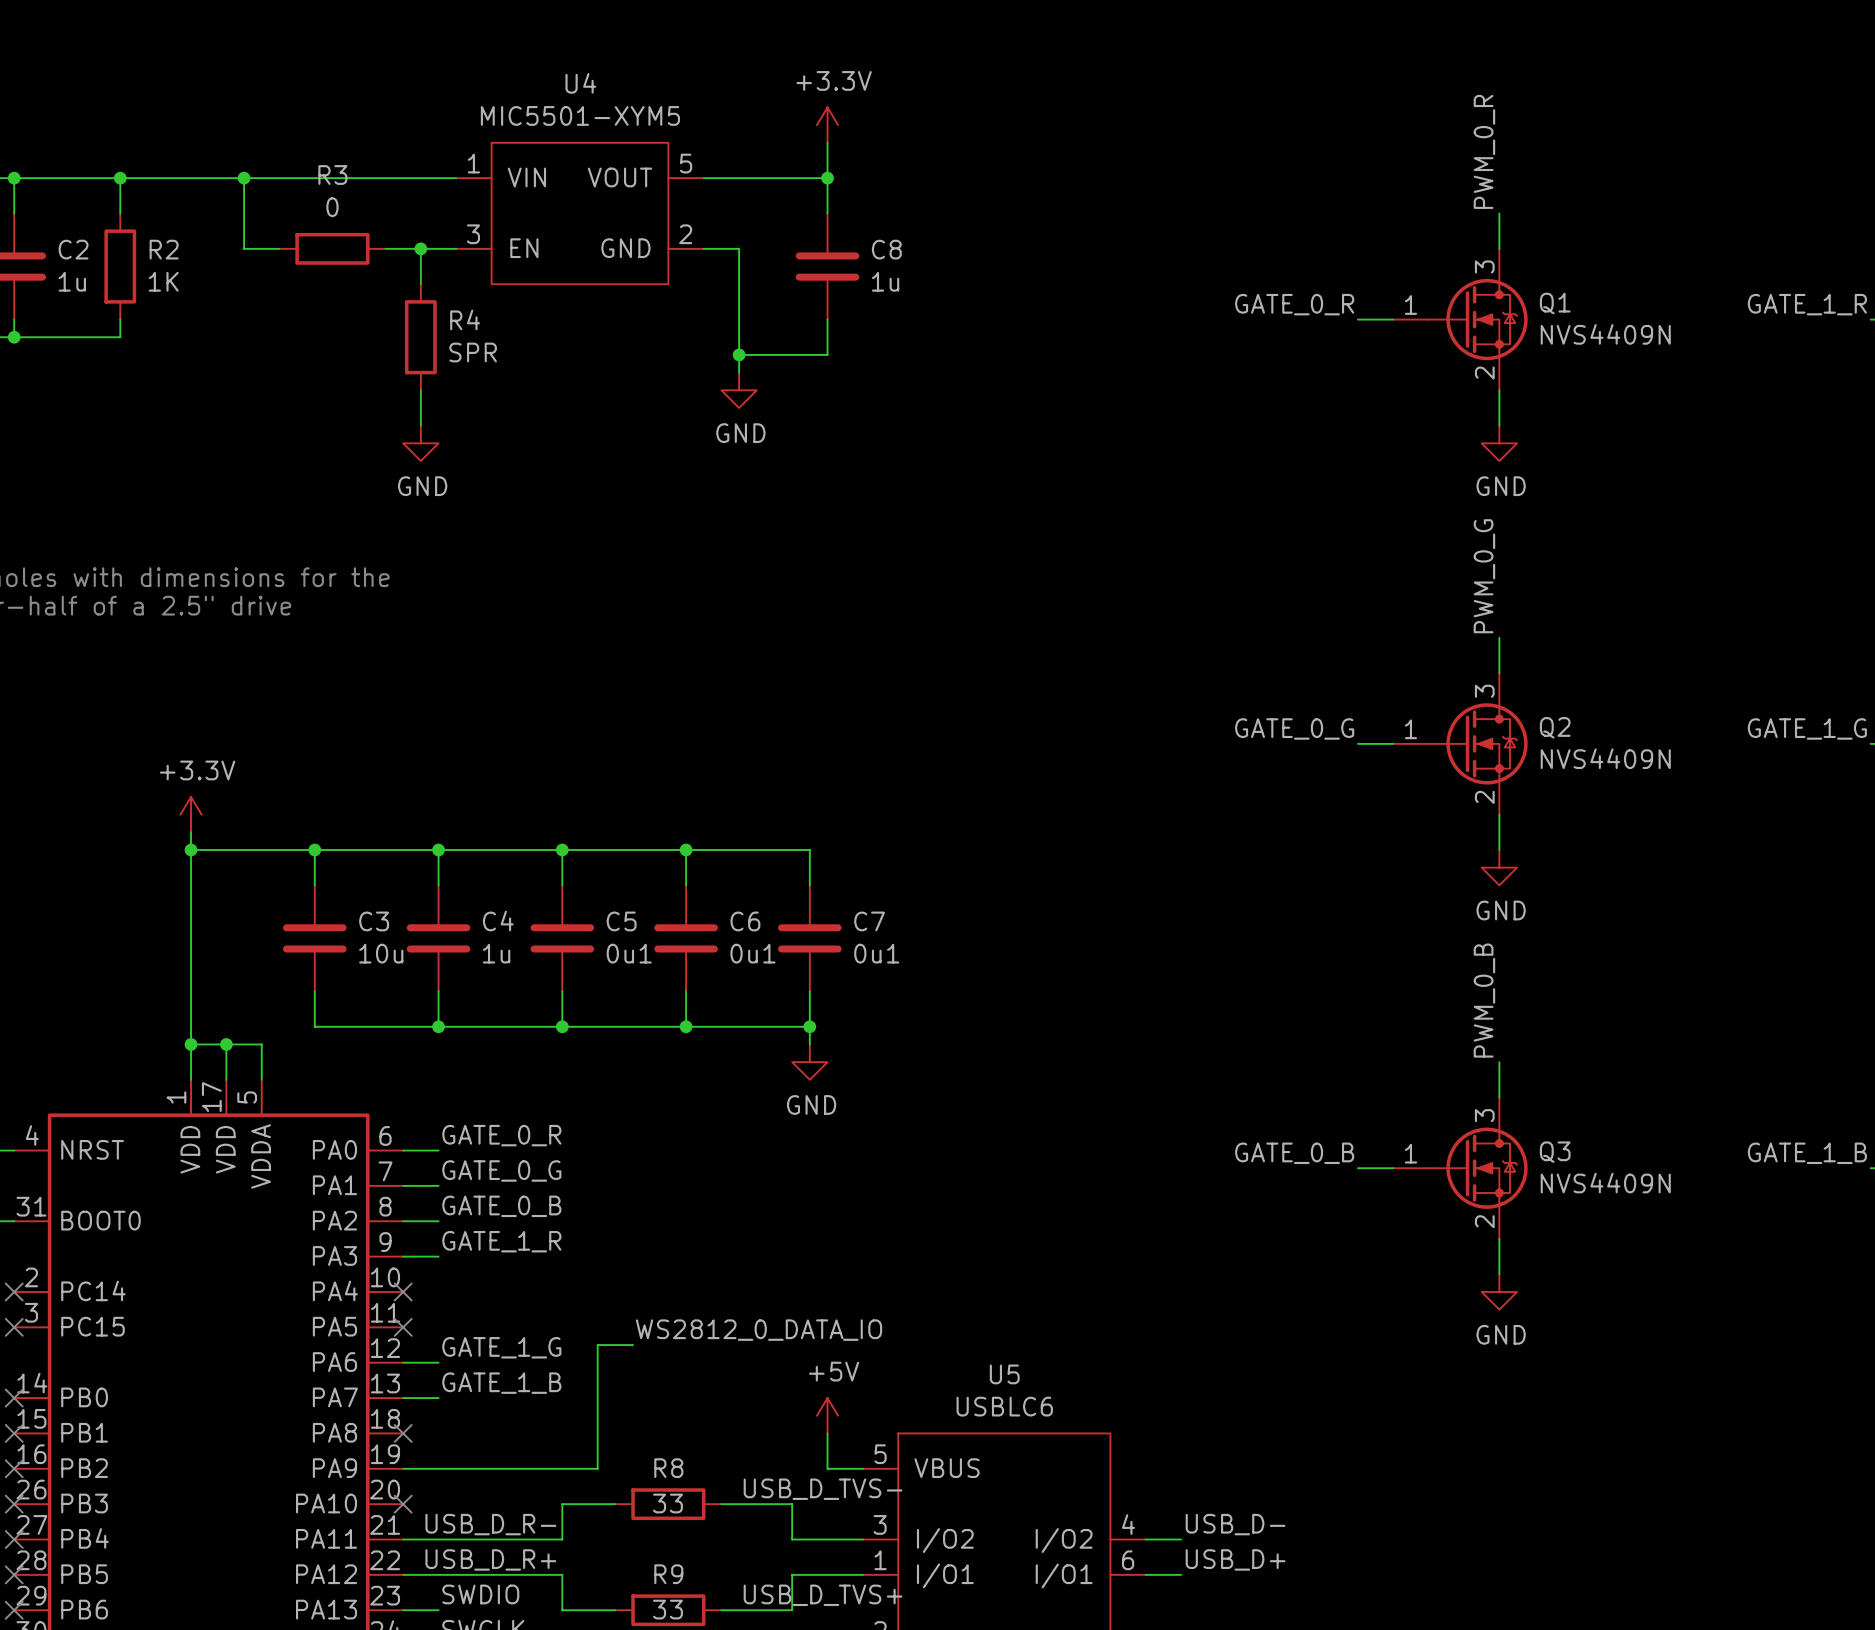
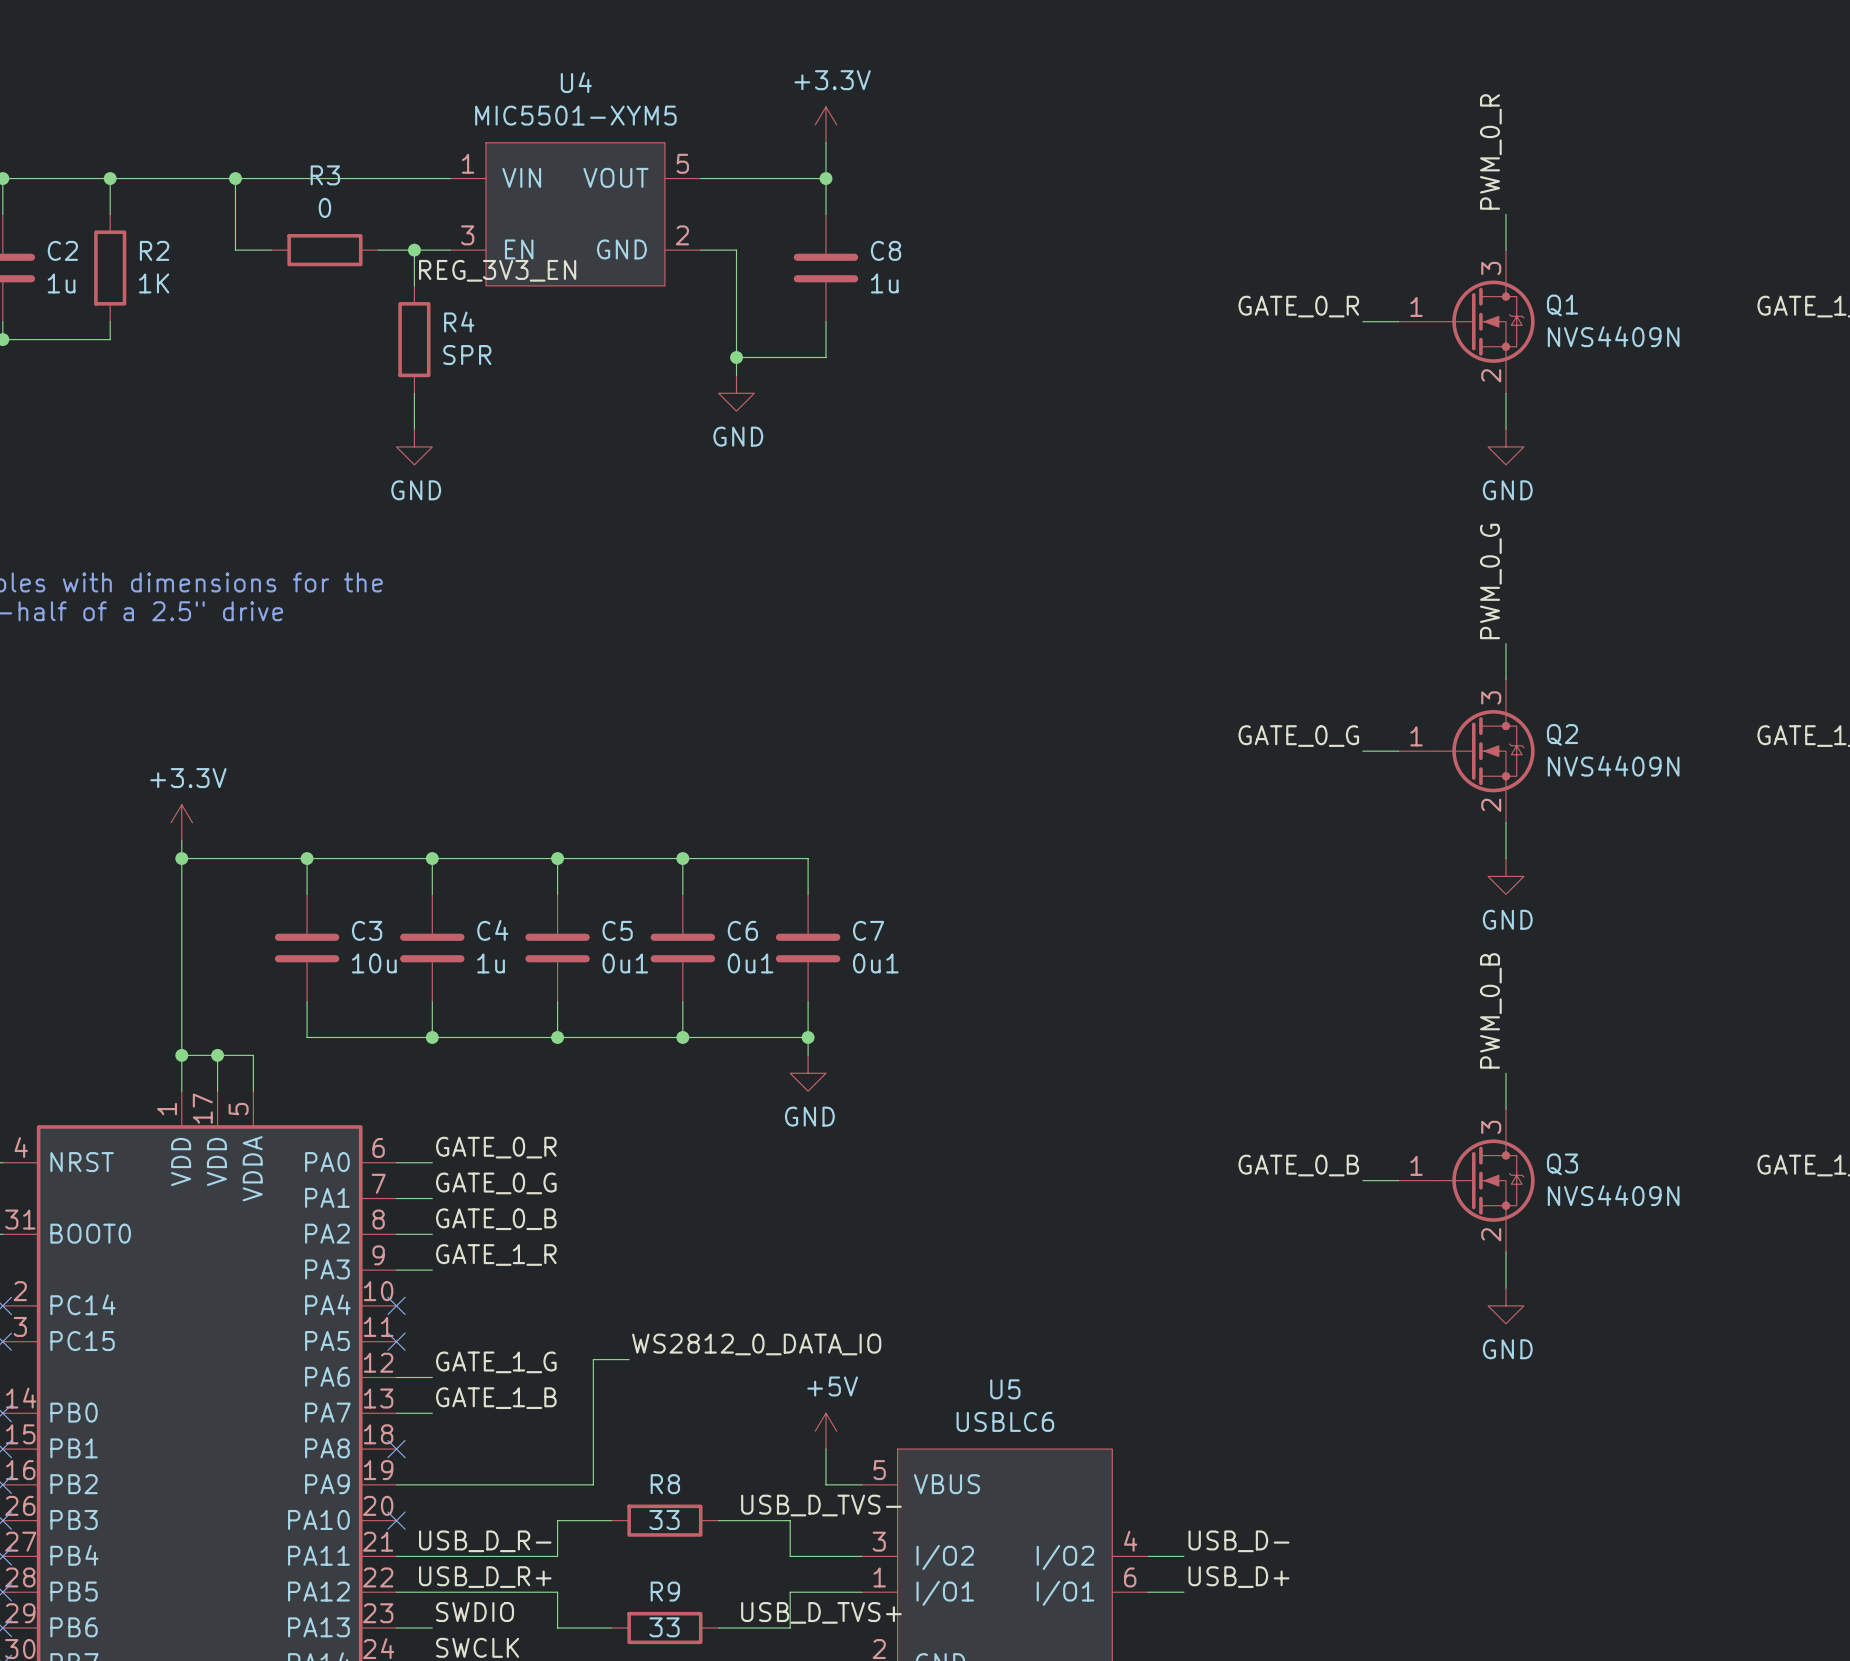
label: none -> REG_3V3_EN (497, 270)

